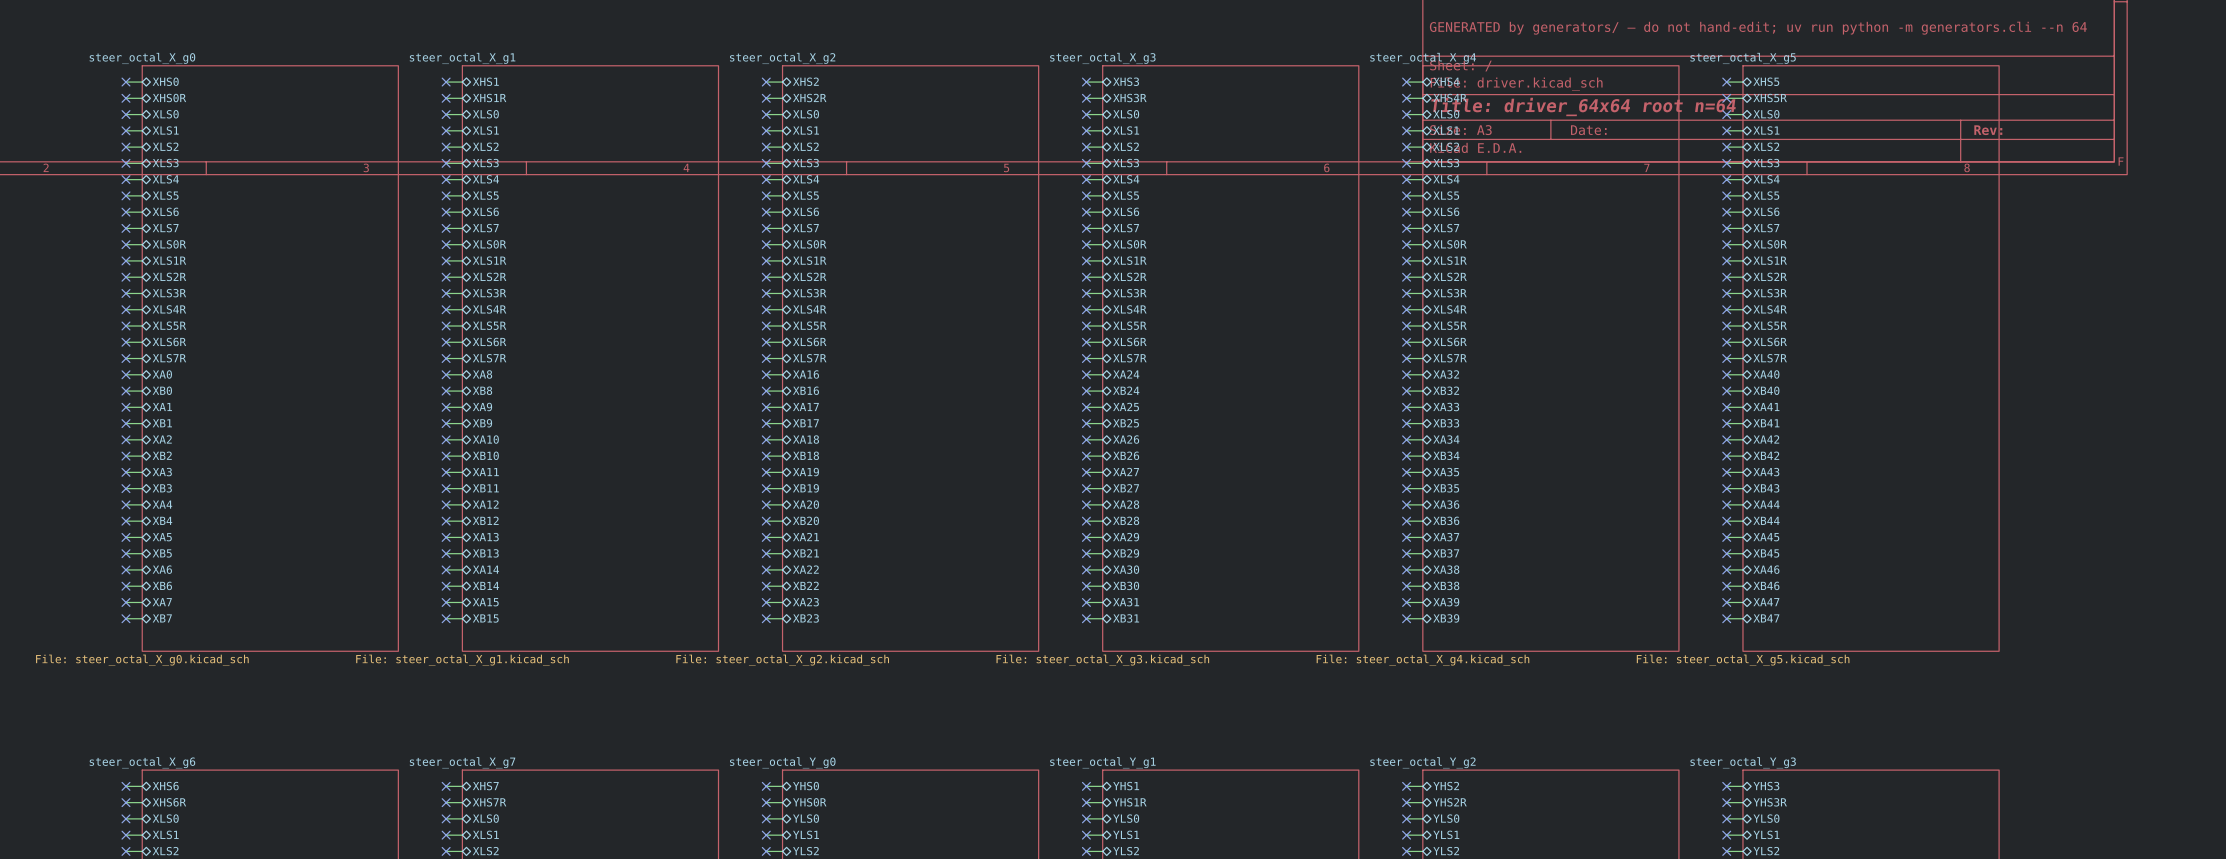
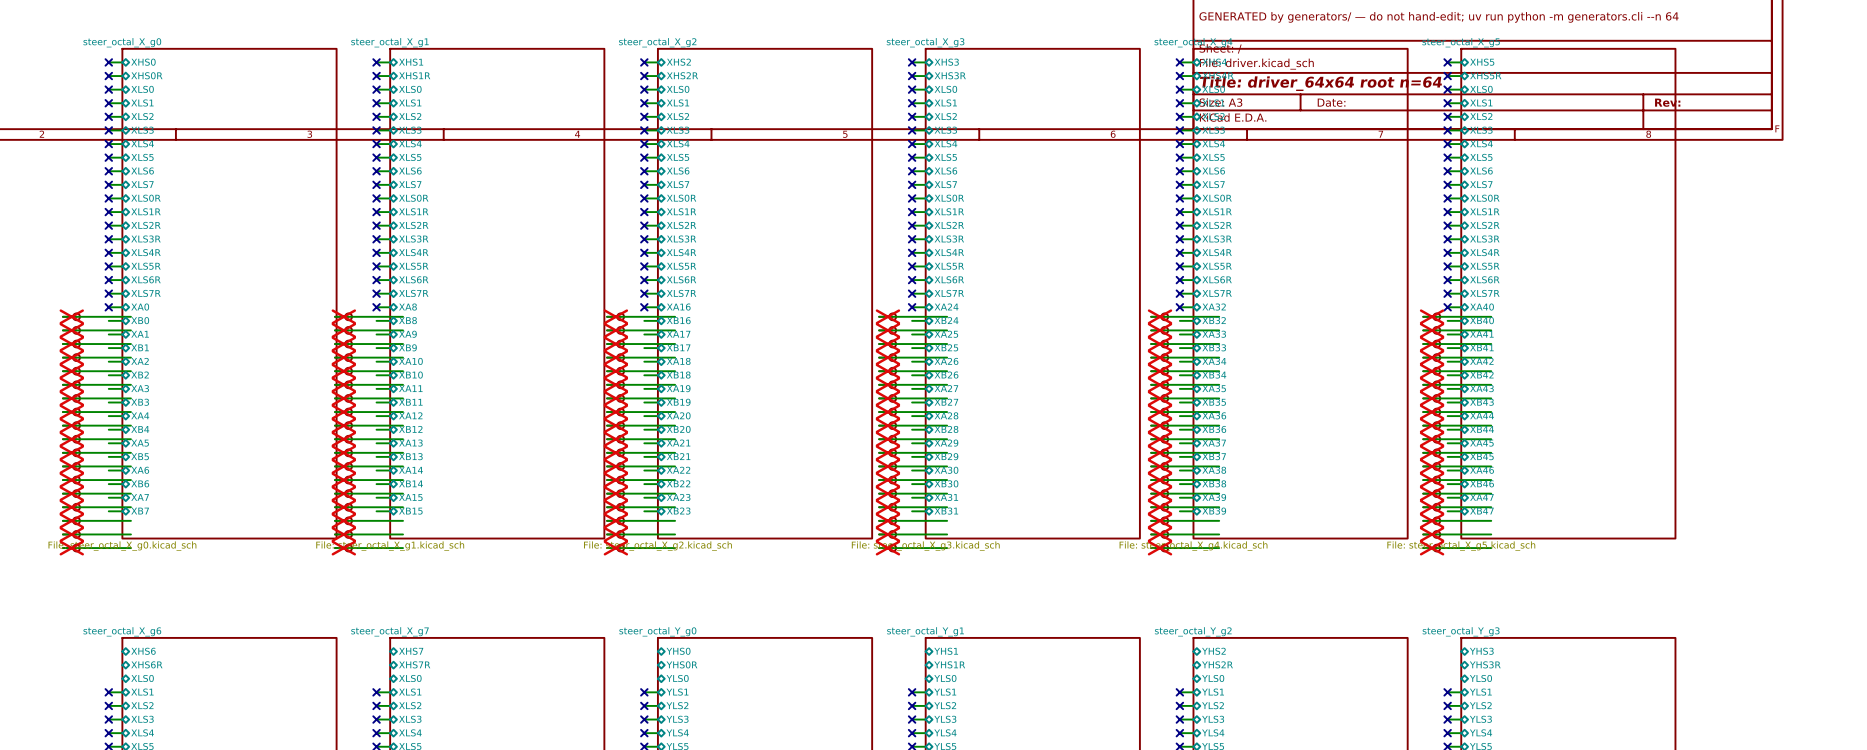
wire: none -> (62, 316) (130, 316)
part: none -> (71, 316)
wire: none -> (334, 316) (403, 316)
part: none -> (343, 316)
wire: none -> (607, 316) (675, 316)
part: none -> (615, 316)
wire: none -> (879, 316) (947, 316)
part: none -> (887, 316)
wire: none -> (1151, 316) (1219, 316)
part: none -> (1160, 316)
wire: none -> (1423, 316) (1491, 316)
part: none -> (1432, 316)
no-connect mark: (125, 391) -> none
no-connect mark: (446, 391) -> none
no-connect mark: (766, 391) -> none
no-connect mark: (1086, 391) -> none
no-connect mark: (1406, 391) -> none
no-connect mark: (1726, 391) -> none
wire: none -> (62, 330) (130, 330)
part: none -> (71, 330)
wire: none -> (334, 330) (403, 330)
part: none -> (343, 330)
wire: none -> (607, 330) (675, 330)
part: none -> (615, 330)
wire: none -> (879, 330) (947, 330)
part: none -> (887, 330)
wire: none -> (1151, 330) (1219, 330)
part: none -> (1160, 330)
wire: none -> (1423, 330) (1491, 330)
part: none -> (1432, 330)
no-connect mark: (125, 407) -> none
no-connect mark: (446, 407) -> none
no-connect mark: (766, 407) -> none
no-connect mark: (1086, 407) -> none
no-connect mark: (1406, 407) -> none
no-connect mark: (1726, 407) -> none
wire: none -> (62, 344) (130, 344)
part: none -> (71, 344)
wire: none -> (334, 344) (403, 344)
part: none -> (343, 344)
wire: none -> (607, 344) (675, 344)
part: none -> (615, 344)
wire: none -> (879, 344) (947, 344)
part: none -> (887, 344)
wire: none -> (1151, 344) (1219, 344)
part: none -> (1160, 344)
wire: none -> (1423, 344) (1491, 344)
part: none -> (1432, 344)
no-connect mark: (125, 423) -> none
no-connect mark: (446, 423) -> none
no-connect mark: (766, 423) -> none
no-connect mark: (1086, 423) -> none
no-connect mark: (1406, 423) -> none
no-connect mark: (1726, 423) -> none
wire: none -> (62, 357) (130, 357)
part: none -> (71, 357)
wire: none -> (334, 357) (403, 357)
part: none -> (343, 357)
wire: none -> (607, 357) (675, 357)
part: none -> (615, 357)
wire: none -> (879, 357) (947, 357)
part: none -> (887, 357)
wire: none -> (1151, 357) (1219, 357)
part: none -> (1160, 357)
wire: none -> (1423, 357) (1491, 357)
part: none -> (1432, 357)
no-connect mark: (125, 439) -> none
no-connect mark: (446, 439) -> none
no-connect mark: (766, 439) -> none
no-connect mark: (1086, 439) -> none
no-connect mark: (1406, 439) -> none
no-connect mark: (1726, 439) -> none
wire: none -> (62, 371) (130, 371)
part: none -> (71, 371)
wire: none -> (334, 371) (403, 371)
part: none -> (343, 371)
wire: none -> (607, 371) (675, 371)
part: none -> (615, 371)
wire: none -> (879, 371) (947, 371)
part: none -> (887, 371)
wire: none -> (1151, 371) (1219, 371)
part: none -> (1160, 371)
wire: none -> (1423, 371) (1491, 371)
part: none -> (1432, 371)
no-connect mark: (125, 456) -> none
no-connect mark: (446, 456) -> none
no-connect mark: (766, 456) -> none
no-connect mark: (1086, 456) -> none
no-connect mark: (1406, 456) -> none
no-connect mark: (1726, 456) -> none
wire: none -> (62, 384) (130, 384)
part: none -> (71, 384)
wire: none -> (334, 384) (403, 384)
part: none -> (343, 384)
wire: none -> (607, 384) (675, 384)
part: none -> (615, 384)
wire: none -> (879, 384) (947, 384)
part: none -> (887, 384)
wire: none -> (1151, 384) (1219, 384)
part: none -> (1160, 384)
wire: none -> (1423, 384) (1491, 384)
part: none -> (1432, 384)
no-connect mark: (125, 472) -> none
no-connect mark: (446, 472) -> none
no-connect mark: (766, 472) -> none
no-connect mark: (1086, 472) -> none
no-connect mark: (1406, 472) -> none
no-connect mark: (1726, 472) -> none
wire: none -> (62, 398) (130, 398)
part: none -> (71, 398)
wire: none -> (334, 398) (403, 398)
part: none -> (343, 398)
wire: none -> (607, 398) (675, 398)
part: none -> (615, 398)
wire: none -> (879, 398) (947, 398)
part: none -> (887, 398)
wire: none -> (1151, 398) (1219, 398)
part: none -> (1160, 398)
wire: none -> (1423, 398) (1491, 398)
part: none -> (1432, 398)
no-connect mark: (125, 488) -> none
no-connect mark: (446, 488) -> none
no-connect mark: (766, 488) -> none
no-connect mark: (1086, 488) -> none
no-connect mark: (1406, 488) -> none
no-connect mark: (1726, 488) -> none
wire: none -> (62, 412) (130, 412)
part: none -> (71, 412)
wire: none -> (334, 412) (403, 412)
part: none -> (343, 412)
wire: none -> (607, 412) (675, 412)
part: none -> (615, 412)
wire: none -> (879, 412) (947, 412)
part: none -> (887, 412)
wire: none -> (1151, 412) (1219, 412)
part: none -> (1160, 412)
wire: none -> (1423, 412) (1491, 412)
part: none -> (1432, 412)
no-connect mark: (125, 504) -> none
no-connect mark: (446, 504) -> none
no-connect mark: (766, 504) -> none
no-connect mark: (1086, 504) -> none
no-connect mark: (1406, 504) -> none
no-connect mark: (1726, 504) -> none
wire: none -> (62, 425) (130, 425)
part: none -> (71, 425)
wire: none -> (334, 425) (403, 425)
part: none -> (343, 425)
wire: none -> (607, 425) (675, 425)
part: none -> (615, 425)
wire: none -> (879, 425) (947, 425)
part: none -> (887, 425)
wire: none -> (1151, 425) (1219, 425)
part: none -> (1160, 425)
wire: none -> (1423, 425) (1491, 425)
part: none -> (1432, 425)
no-connect mark: (125, 521) -> none
no-connect mark: (446, 521) -> none
no-connect mark: (766, 521) -> none
no-connect mark: (1086, 521) -> none
no-connect mark: (1406, 521) -> none
no-connect mark: (1726, 521) -> none
wire: none -> (62, 439) (130, 439)
part: none -> (71, 439)
wire: none -> (334, 439) (403, 439)
part: none -> (343, 439)
wire: none -> (607, 439) (675, 439)
part: none -> (615, 439)
wire: none -> (879, 439) (947, 439)
part: none -> (887, 439)
wire: none -> (1151, 439) (1219, 439)
part: none -> (1160, 439)
wire: none -> (1423, 439) (1491, 439)
part: none -> (1432, 439)
no-connect mark: (125, 537) -> none
no-connect mark: (446, 537) -> none
no-connect mark: (766, 537) -> none
no-connect mark: (1086, 537) -> none
no-connect mark: (1406, 537) -> none
no-connect mark: (1726, 537) -> none
wire: none -> (62, 452) (130, 452)
part: none -> (71, 452)
wire: none -> (334, 452) (403, 452)
part: none -> (343, 452)
wire: none -> (607, 452) (675, 452)
part: none -> (615, 452)
wire: none -> (879, 452) (947, 452)
part: none -> (887, 452)
wire: none -> (1151, 452) (1219, 452)
part: none -> (1160, 452)
wire: none -> (1423, 452) (1491, 452)
part: none -> (1432, 452)
no-connect mark: (125, 553) -> none
no-connect mark: (446, 553) -> none
no-connect mark: (766, 553) -> none
no-connect mark: (1086, 553) -> none
no-connect mark: (1406, 553) -> none
no-connect mark: (1726, 553) -> none
wire: none -> (62, 466) (130, 466)
part: none -> (71, 466)
wire: none -> (334, 466) (403, 466)
part: none -> (343, 466)
wire: none -> (607, 466) (675, 466)
part: none -> (615, 466)
wire: none -> (879, 466) (947, 466)
part: none -> (887, 466)
wire: none -> (1151, 466) (1219, 466)
part: none -> (1160, 466)
wire: none -> (1423, 466) (1491, 466)
part: none -> (1432, 466)
no-connect mark: (125, 569) -> none
no-connect mark: (446, 569) -> none
no-connect mark: (766, 569) -> none
no-connect mark: (1086, 569) -> none
no-connect mark: (1406, 569) -> none
no-connect mark: (1726, 569) -> none
wire: none -> (62, 480) (130, 480)
part: none -> (71, 480)
wire: none -> (334, 480) (403, 480)
part: none -> (343, 480)
wire: none -> (607, 480) (675, 480)
part: none -> (615, 480)
wire: none -> (879, 480) (947, 480)
part: none -> (887, 480)
wire: none -> (1151, 480) (1219, 480)
part: none -> (1160, 480)
wire: none -> (1423, 480) (1491, 480)
part: none -> (1432, 480)
no-connect mark: (125, 586) -> none
no-connect mark: (446, 586) -> none
no-connect mark: (766, 586) -> none
no-connect mark: (1086, 586) -> none
no-connect mark: (1406, 586) -> none
no-connect mark: (1726, 586) -> none
wire: none -> (62, 493) (130, 493)
part: none -> (71, 493)
wire: none -> (334, 493) (403, 493)
part: none -> (343, 493)
wire: none -> (607, 493) (675, 493)
part: none -> (615, 493)
wire: none -> (879, 493) (947, 493)
part: none -> (887, 493)
wire: none -> (1151, 493) (1219, 493)
part: none -> (1160, 493)
wire: none -> (1423, 493) (1491, 493)
part: none -> (1432, 493)
no-connect mark: (125, 602) -> none
no-connect mark: (446, 602) -> none
no-connect mark: (766, 602) -> none
no-connect mark: (1086, 602) -> none
no-connect mark: (1406, 602) -> none
no-connect mark: (1726, 602) -> none
wire: none -> (62, 507) (130, 507)
part: none -> (71, 507)
wire: none -> (334, 507) (403, 507)
part: none -> (343, 507)
wire: none -> (607, 507) (675, 507)
part: none -> (615, 507)
wire: none -> (879, 507) (947, 507)
part: none -> (887, 507)
wire: none -> (1151, 507) (1219, 507)
part: none -> (1160, 507)
wire: none -> (1423, 507) (1491, 507)
part: none -> (1432, 507)
no-connect mark: (125, 618) -> none
no-connect mark: (446, 618) -> none
no-connect mark: (766, 618) -> none
no-connect mark: (1086, 618) -> none
no-connect mark: (1406, 618) -> none
no-connect mark: (1726, 618) -> none
wire: none -> (62, 520) (130, 520)
part: none -> (71, 520)
wire: none -> (334, 520) (403, 520)
part: none -> (343, 520)
wire: none -> (607, 520) (675, 520)
part: none -> (615, 520)
wire: none -> (879, 520) (947, 520)
part: none -> (887, 520)
wire: none -> (1151, 520) (1219, 520)
part: none -> (1160, 520)
wire: none -> (1423, 520) (1491, 520)
part: none -> (1432, 520)
wire: none -> (62, 534) (130, 534)
part: none -> (71, 534)
wire: none -> (334, 534) (403, 534)
part: none -> (343, 534)
wire: none -> (607, 534) (675, 534)
part: none -> (615, 534)
wire: none -> (879, 534) (947, 534)
part: none -> (887, 534)
wire: none -> (1151, 534) (1219, 534)
part: none -> (1160, 534)
wire: none -> (1423, 534) (1491, 534)
part: none -> (1432, 534)
wire: none -> (62, 548) (130, 548)
part: none -> (71, 548)
wire: none -> (334, 548) (403, 548)
part: none -> (343, 548)
wire: none -> (607, 548) (675, 548)
part: none -> (615, 548)
wire: none -> (879, 548) (947, 548)
part: none -> (887, 548)
wire: none -> (1151, 548) (1219, 548)
part: none -> (1160, 548)
wire: none -> (1423, 548) (1491, 548)
part: none -> (1432, 548)
wire: (125, 786) (142, 786) -> none
no-connect mark: (125, 786) -> none
wire: (446, 786) (462, 786) -> none
no-connect mark: (446, 786) -> none
wire: (766, 786) (782, 786) -> none
no-connect mark: (766, 786) -> none
wire: (1086, 786) (1102, 786) -> none
no-connect mark: (1086, 786) -> none
wire: (1406, 786) (1422, 786) -> none
no-connect mark: (1406, 786) -> none
wire: (1726, 786) (1742, 786) -> none
no-connect mark: (1726, 786) -> none
wire: (125, 802) (142, 802) -> none
no-connect mark: (125, 802) -> none
wire: (446, 802) (462, 802) -> none
no-connect mark: (446, 802) -> none
wire: (766, 802) (782, 802) -> none
no-connect mark: (766, 802) -> none
wire: (1086, 802) (1102, 802) -> none
no-connect mark: (1086, 802) -> none
wire: (1406, 802) (1422, 802) -> none
no-connect mark: (1406, 802) -> none
wire: (1726, 802) (1742, 802) -> none
no-connect mark: (1726, 802) -> none
wire: (125, 818) (142, 818) -> none
no-connect mark: (125, 818) -> none
wire: (446, 818) (462, 818) -> none
no-connect mark: (446, 818) -> none
wire: (766, 818) (782, 818) -> none
no-connect mark: (766, 818) -> none
wire: (1086, 818) (1102, 818) -> none
no-connect mark: (1086, 818) -> none
wire: (1406, 818) (1422, 818) -> none
no-connect mark: (1406, 818) -> none
wire: (1726, 818) (1742, 818) -> none
no-connect mark: (1726, 818) -> none

